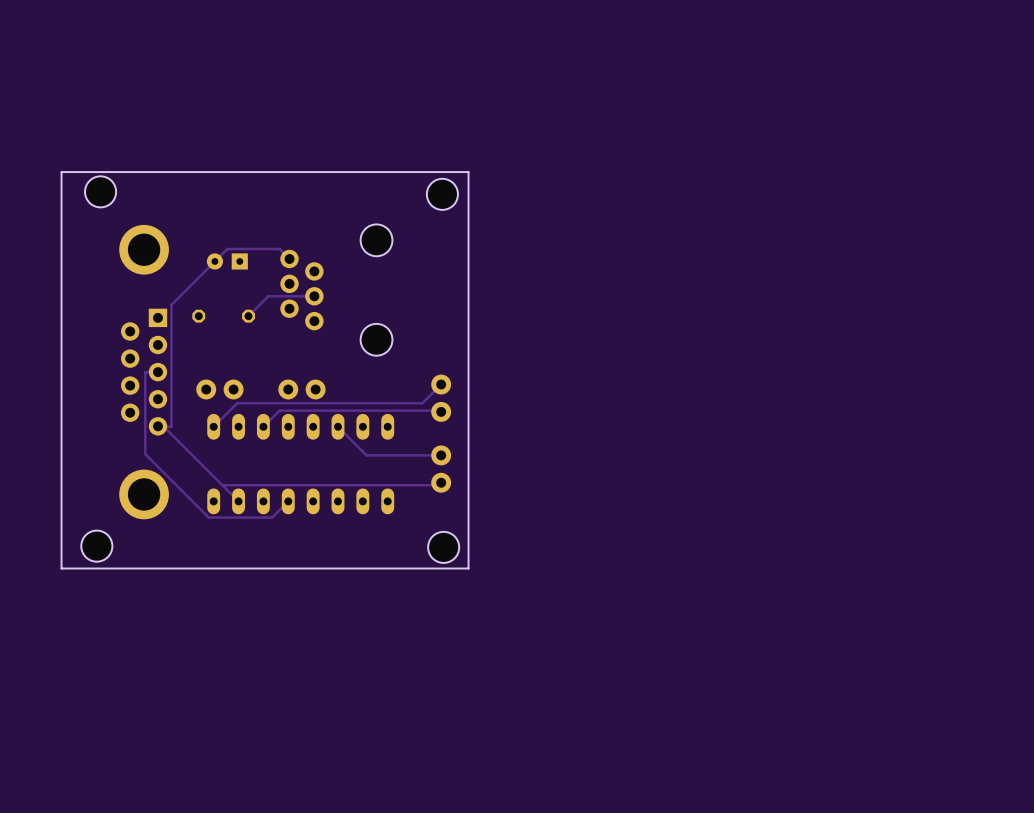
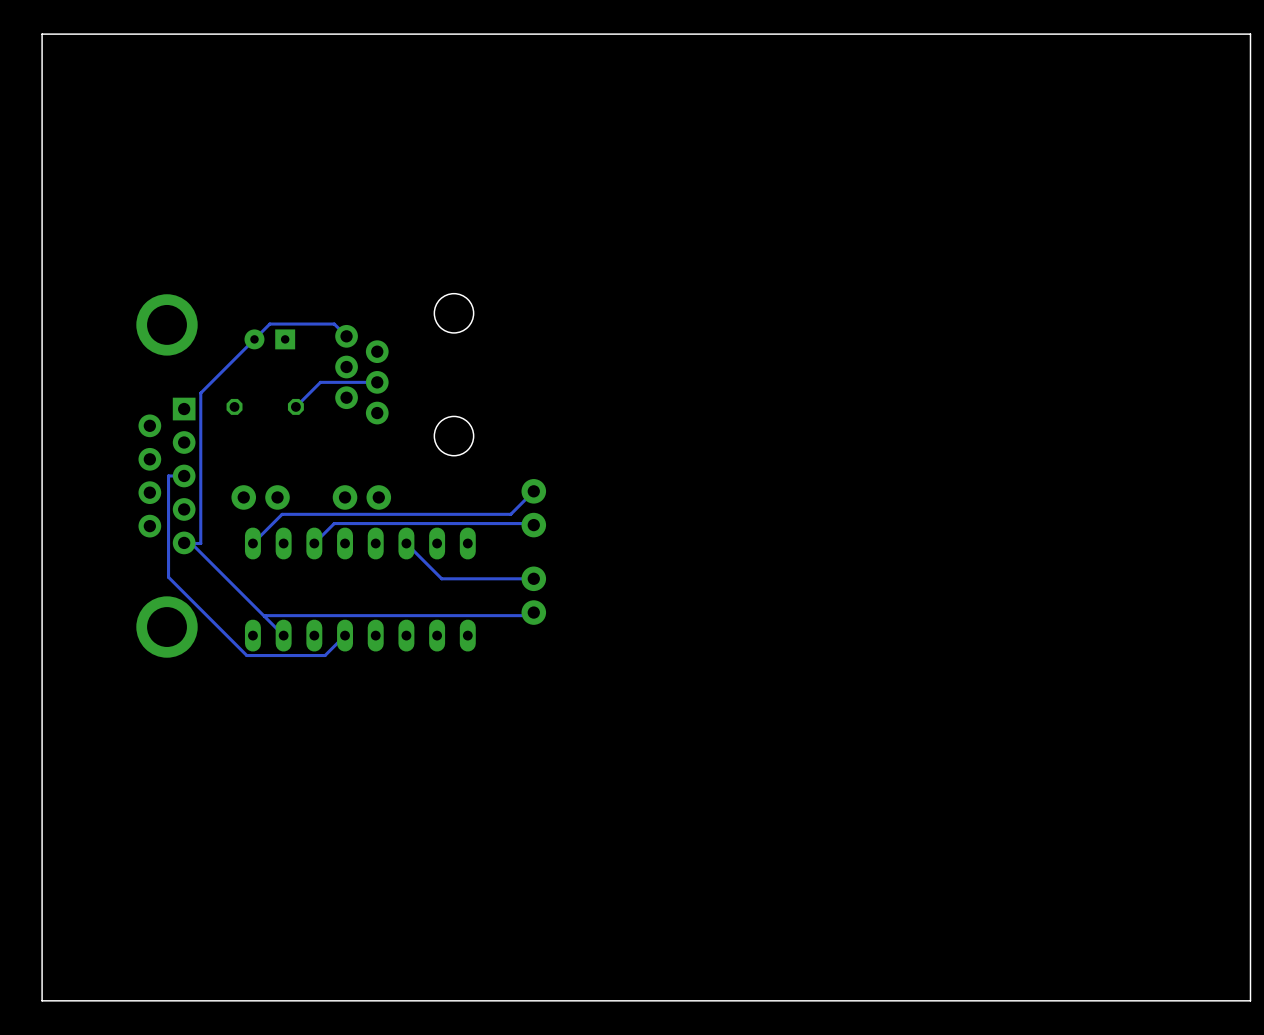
board edge: none -> (1250, 34) (42, 34) (42, 1000) (1250, 1000) (1250, 34)
board edge: (468, 172) (61, 172) (61, 568) (468, 568) (468, 172) -> none
hole: (100, 191) -> none
hole: (442, 194) -> none
hole: (96, 546) -> none
hole: (443, 547) -> none

